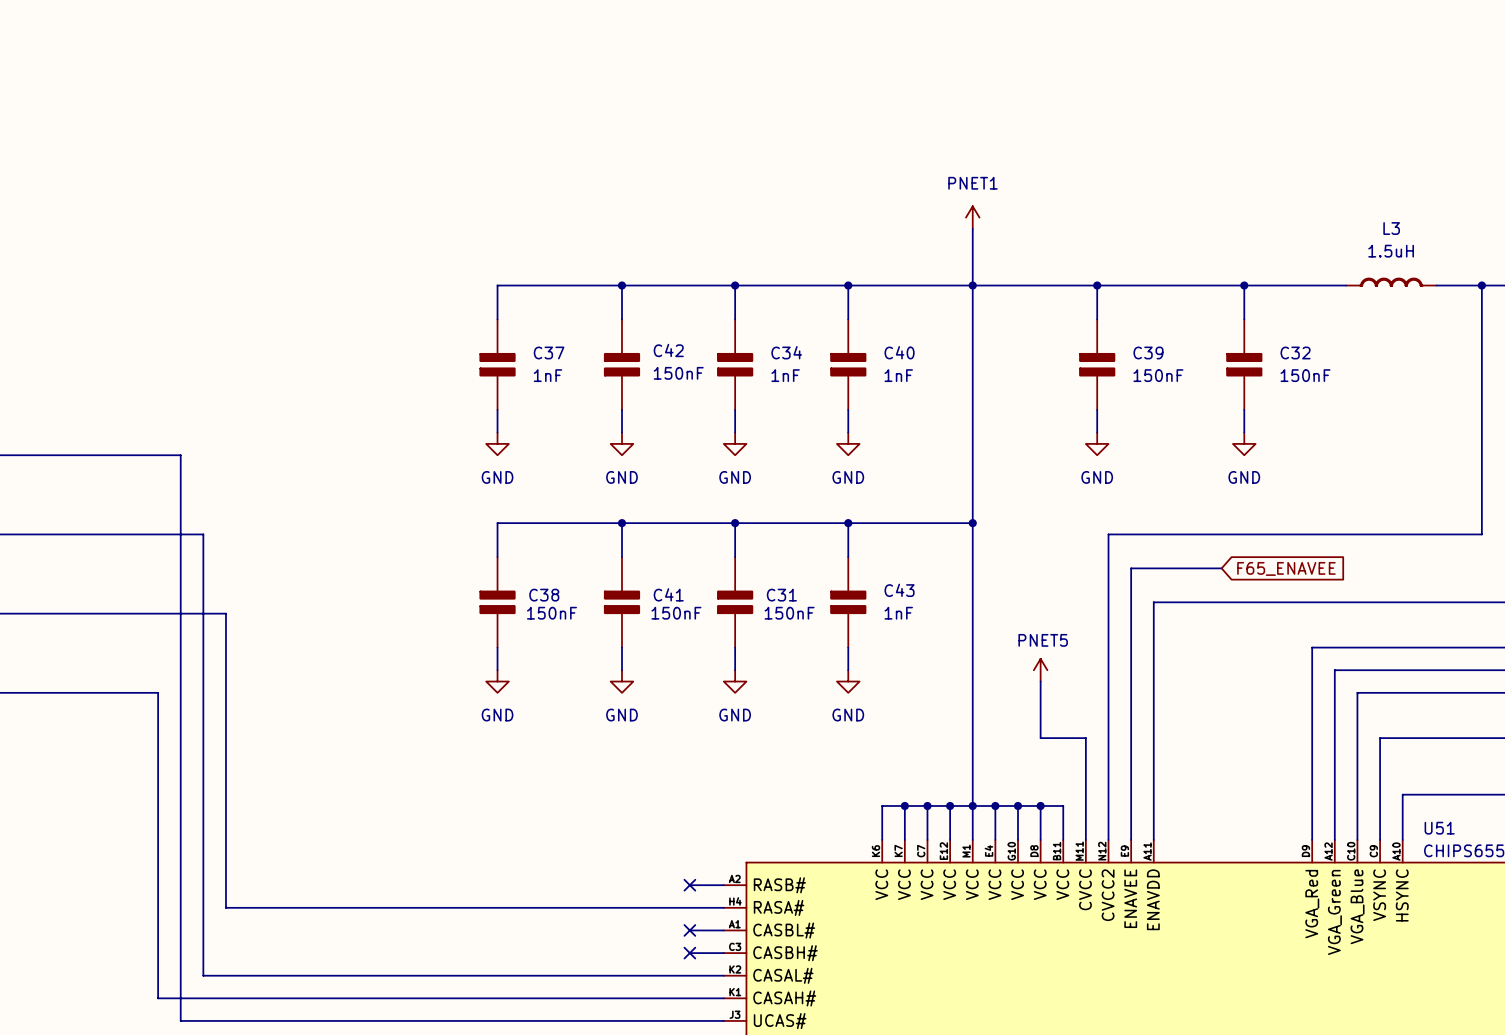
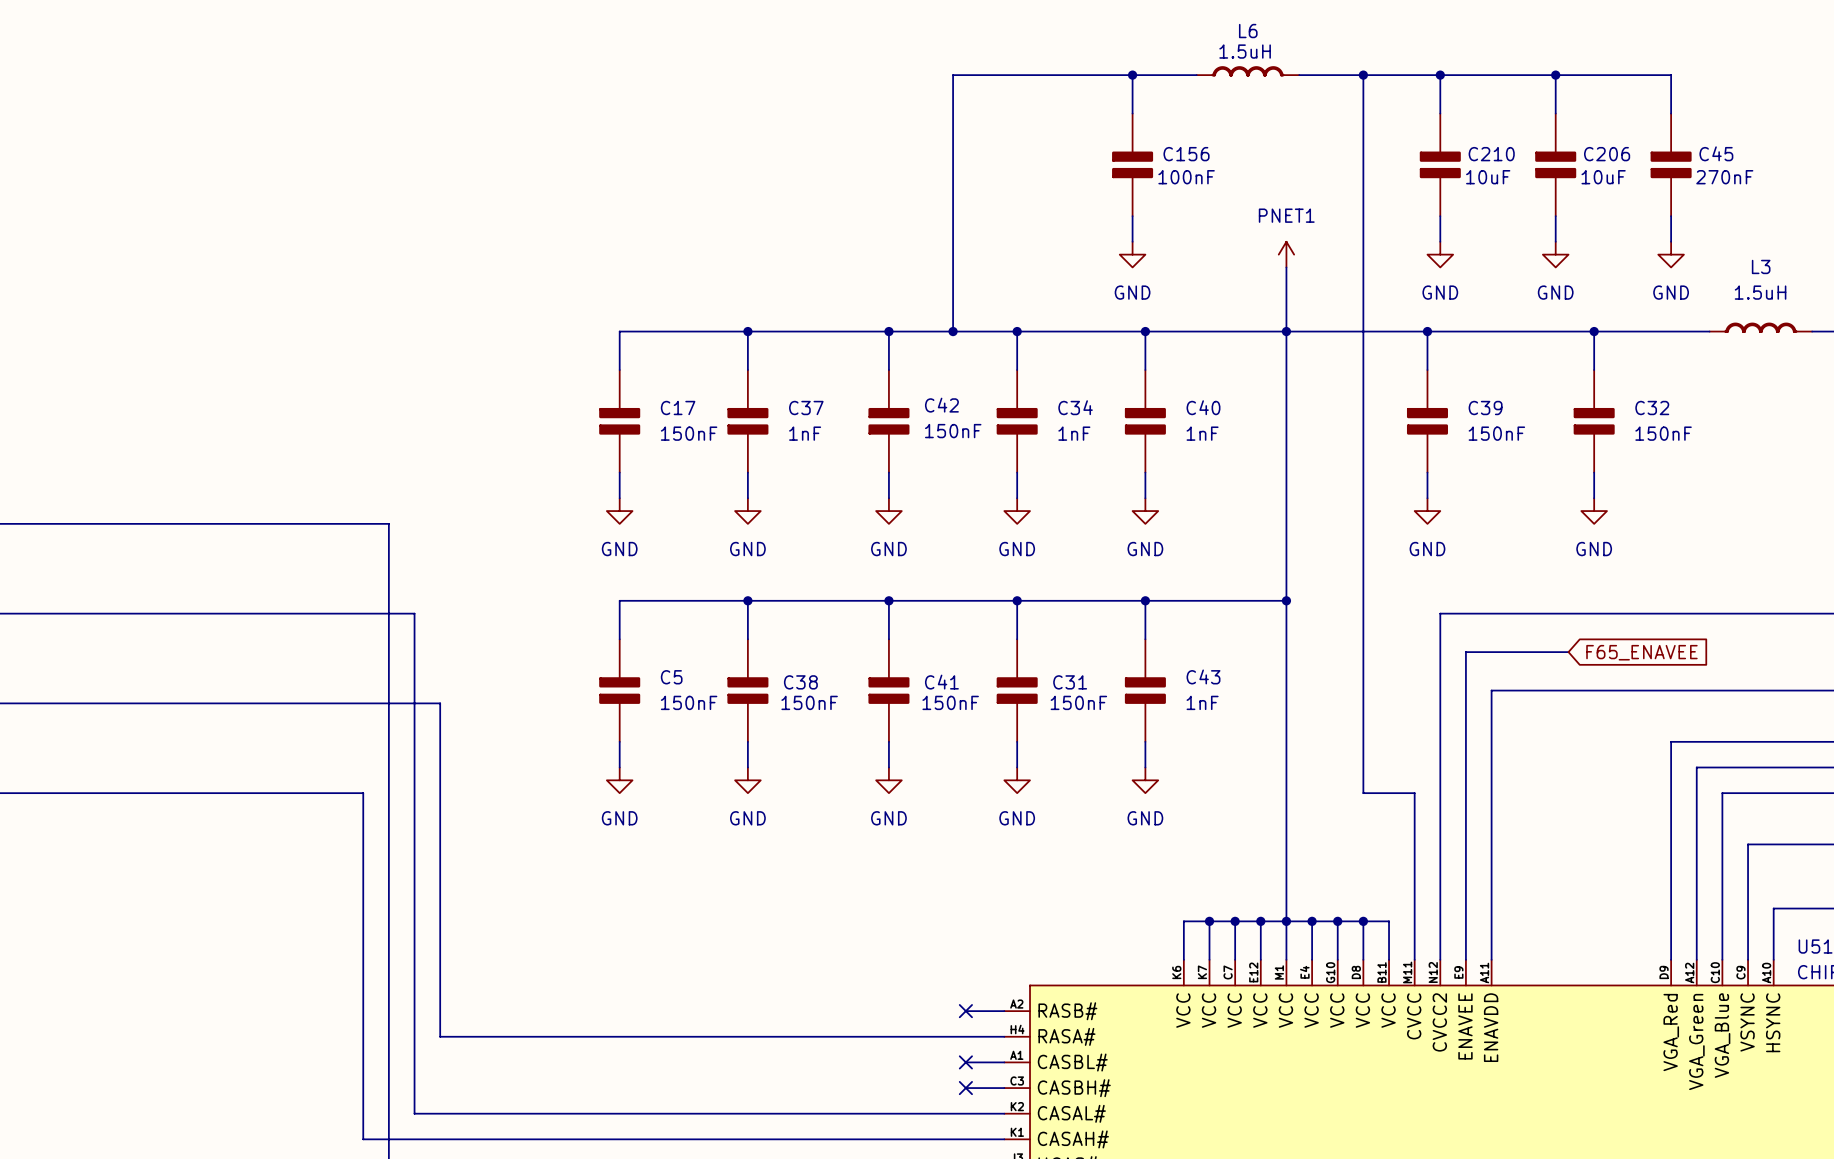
L6: none -> 1.5uH (1247, 71)
wire: none -> (1132, 75) (1132, 113)
junction: none -> (1132, 75)
wire: none -> (1196, 75) (953, 75) (953, 331)
wire: none -> (1299, 75) (1671, 75) (1671, 113)
wire: none -> (1363, 75) (1363, 780)
junction: none -> (1363, 75)
wire: none -> (1440, 75) (1440, 113)
junction: none -> (1440, 75)
wire: none -> (1555, 75) (1555, 113)
junction: none -> (1555, 75)
C156: none -> 100nF (1132, 164)
C210: none -> 10uF (1440, 164)
C206: none -> 10uF (1555, 164)
C45: none -> 270nF (1671, 164)
wire: none -> (1132, 216) (1132, 241)
wire: none -> (1440, 216) (1440, 241)
wire: none -> (1555, 216) (1555, 241)
wire: none -> (1671, 216) (1671, 241)
power symbol: none -> GND (1132, 254)
power symbol: none -> GND (1440, 254)
power symbol: none -> GND (1555, 254)
power symbol: none -> GND (1671, 254)
wire: none -> (747, 331) (619, 331) (619, 370)
junction: none -> (747, 331)
junction: none -> (953, 331)
C17: none -> 150nF (619, 421)
wire: none -> (619, 472) (619, 498)
power symbol: none -> GND (619, 511)
wire: none -> (747, 600) (619, 600) (619, 639)
junction: none -> (747, 600)
C5: none -> 150nF (619, 690)
wire: none -> (619, 741) (619, 767)
power symbol: PNET5 (1040, 670) -> none
power symbol: none -> GND (619, 780)
wire: (1040, 692) (1040, 738) (1085, 738) -> (1363, 793) (1414, 793) (1414, 844)

